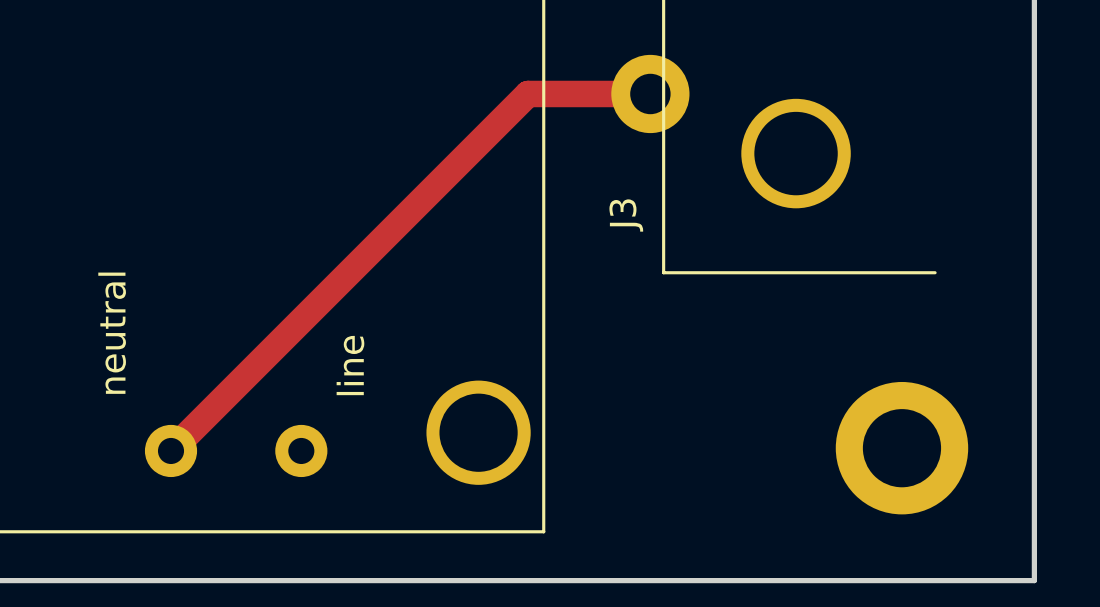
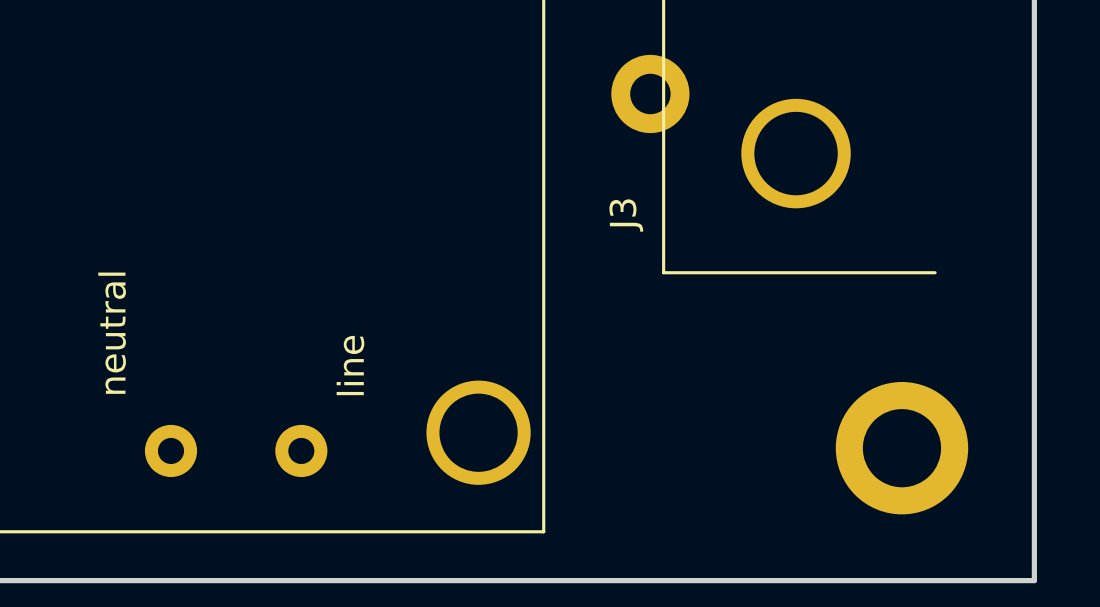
track: (650, 93) (527, 93) (171, 450) -> none

